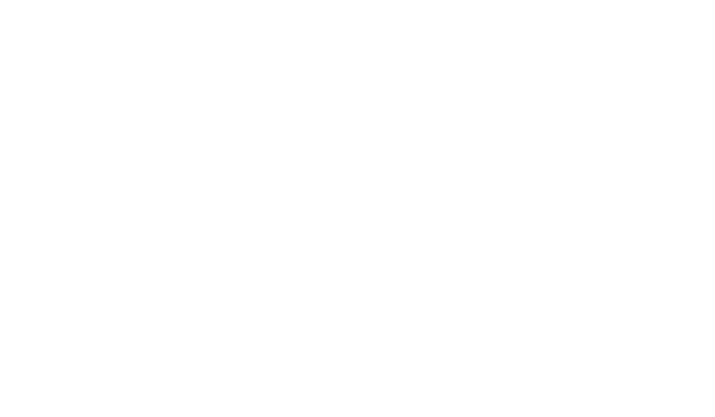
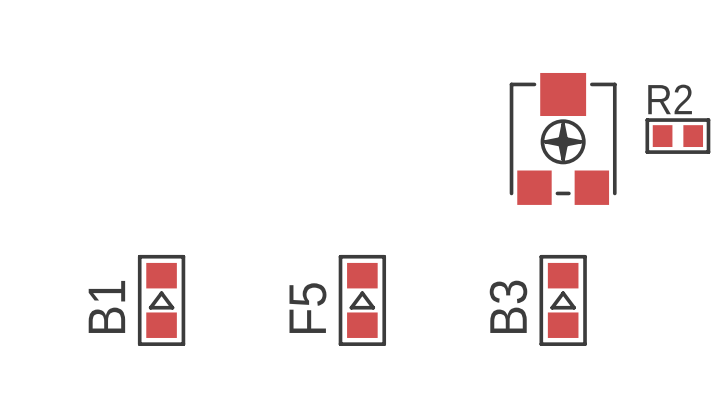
R2: none -> (677, 136)
part: none -> (563, 138)
B1: none -> (161, 300)
F5: none -> (362, 300)
B3: none -> (563, 300)

